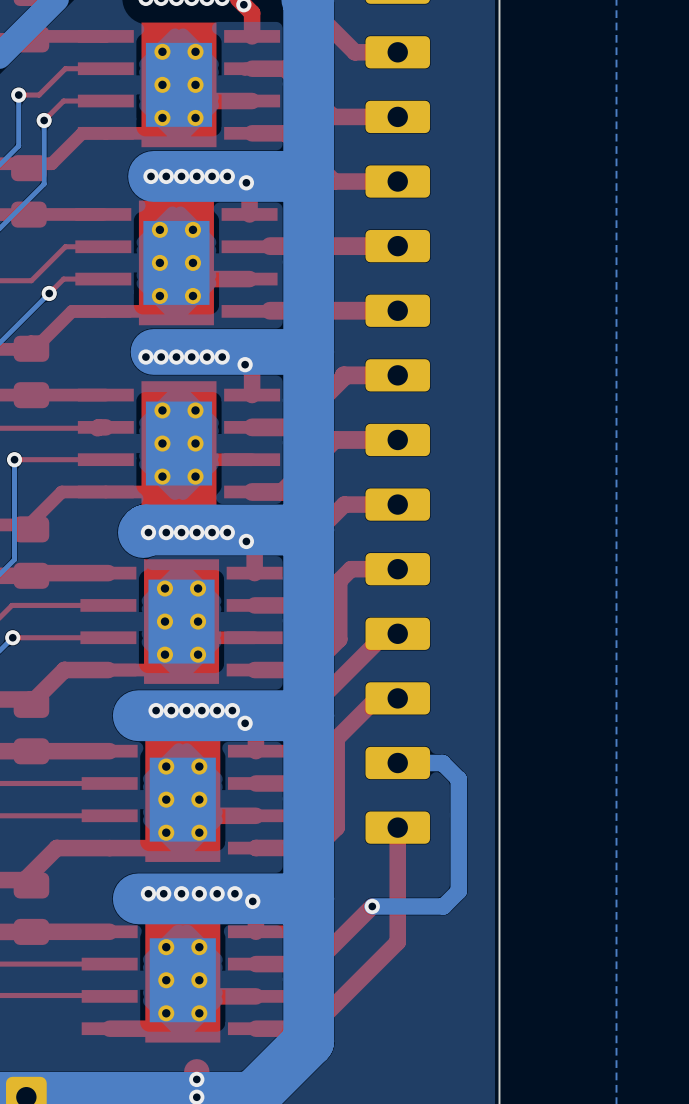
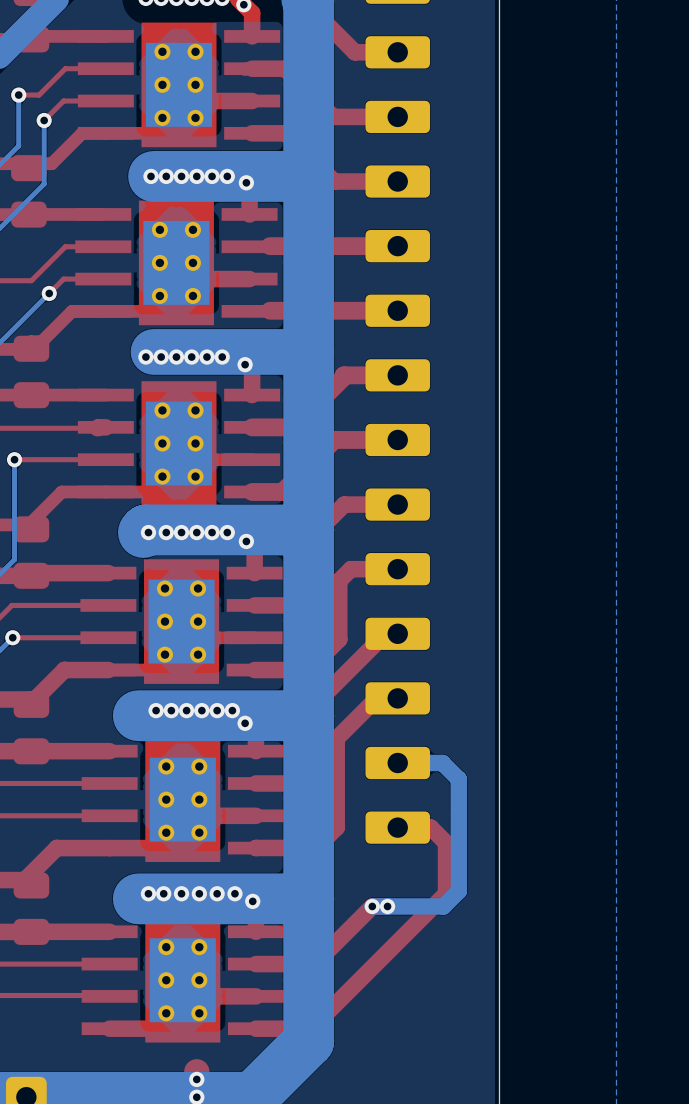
top track: (397, 827) (397, 942) -> (397, 827) (430, 827) (446, 842) (446, 893) (397, 942)
via: none -> (387, 906)

